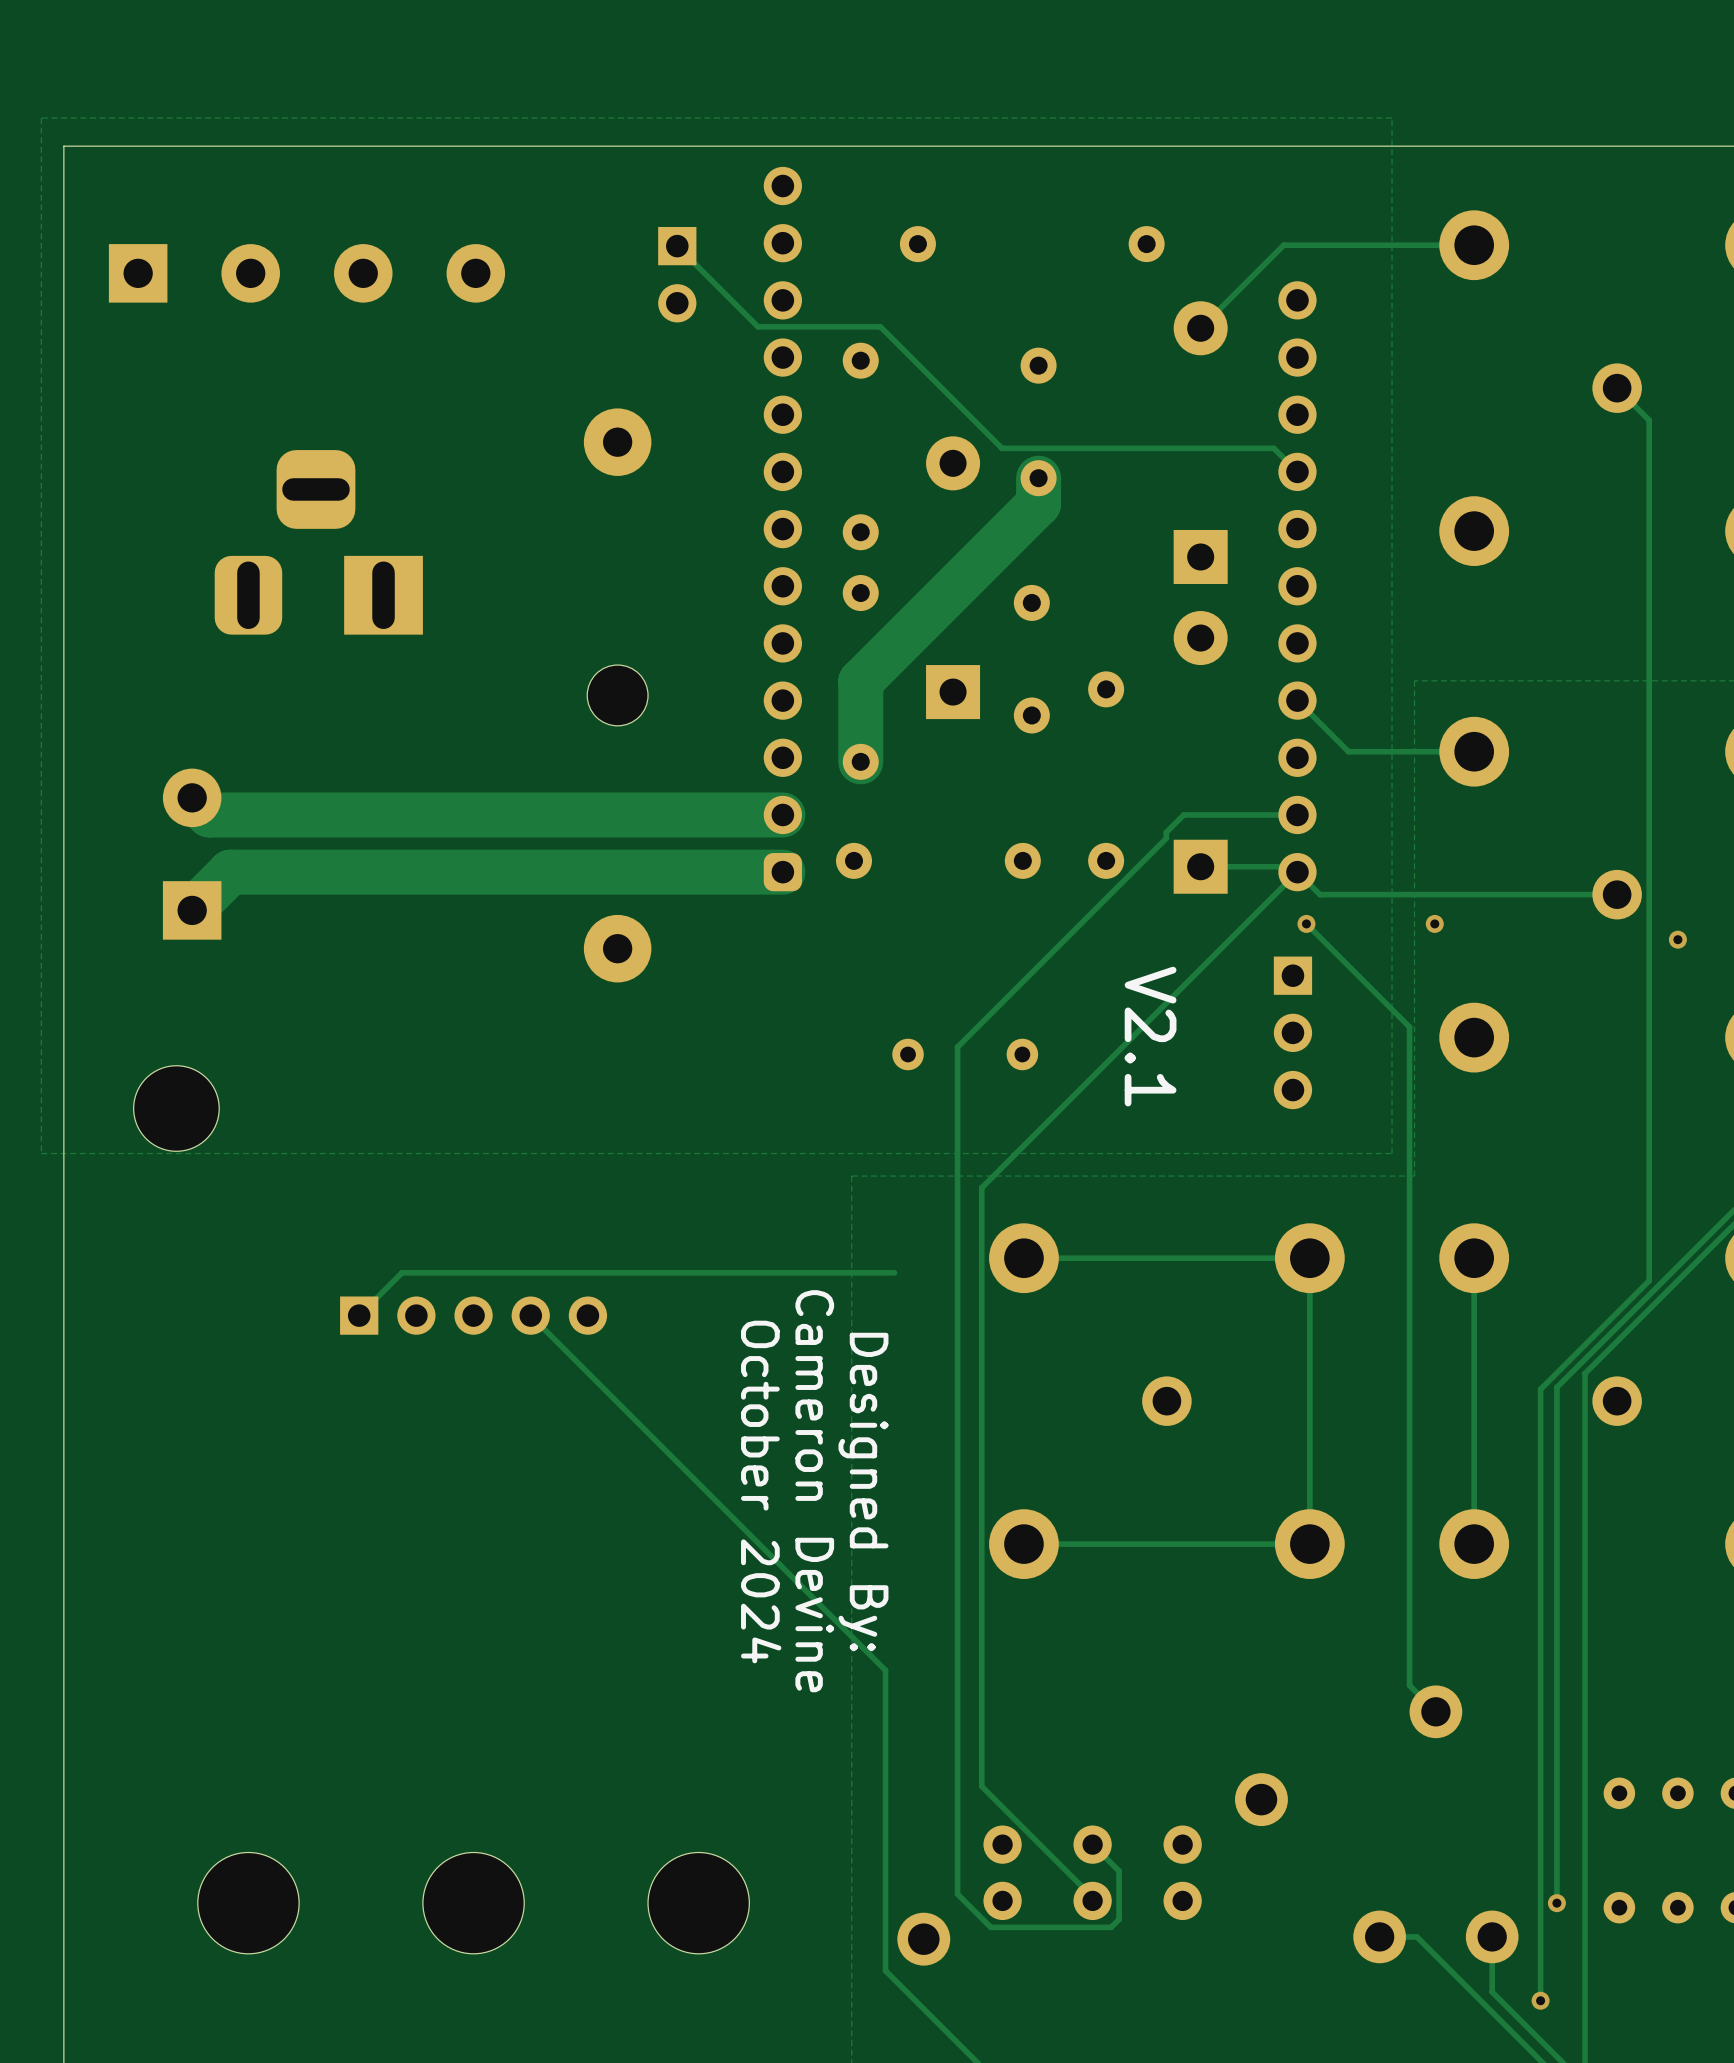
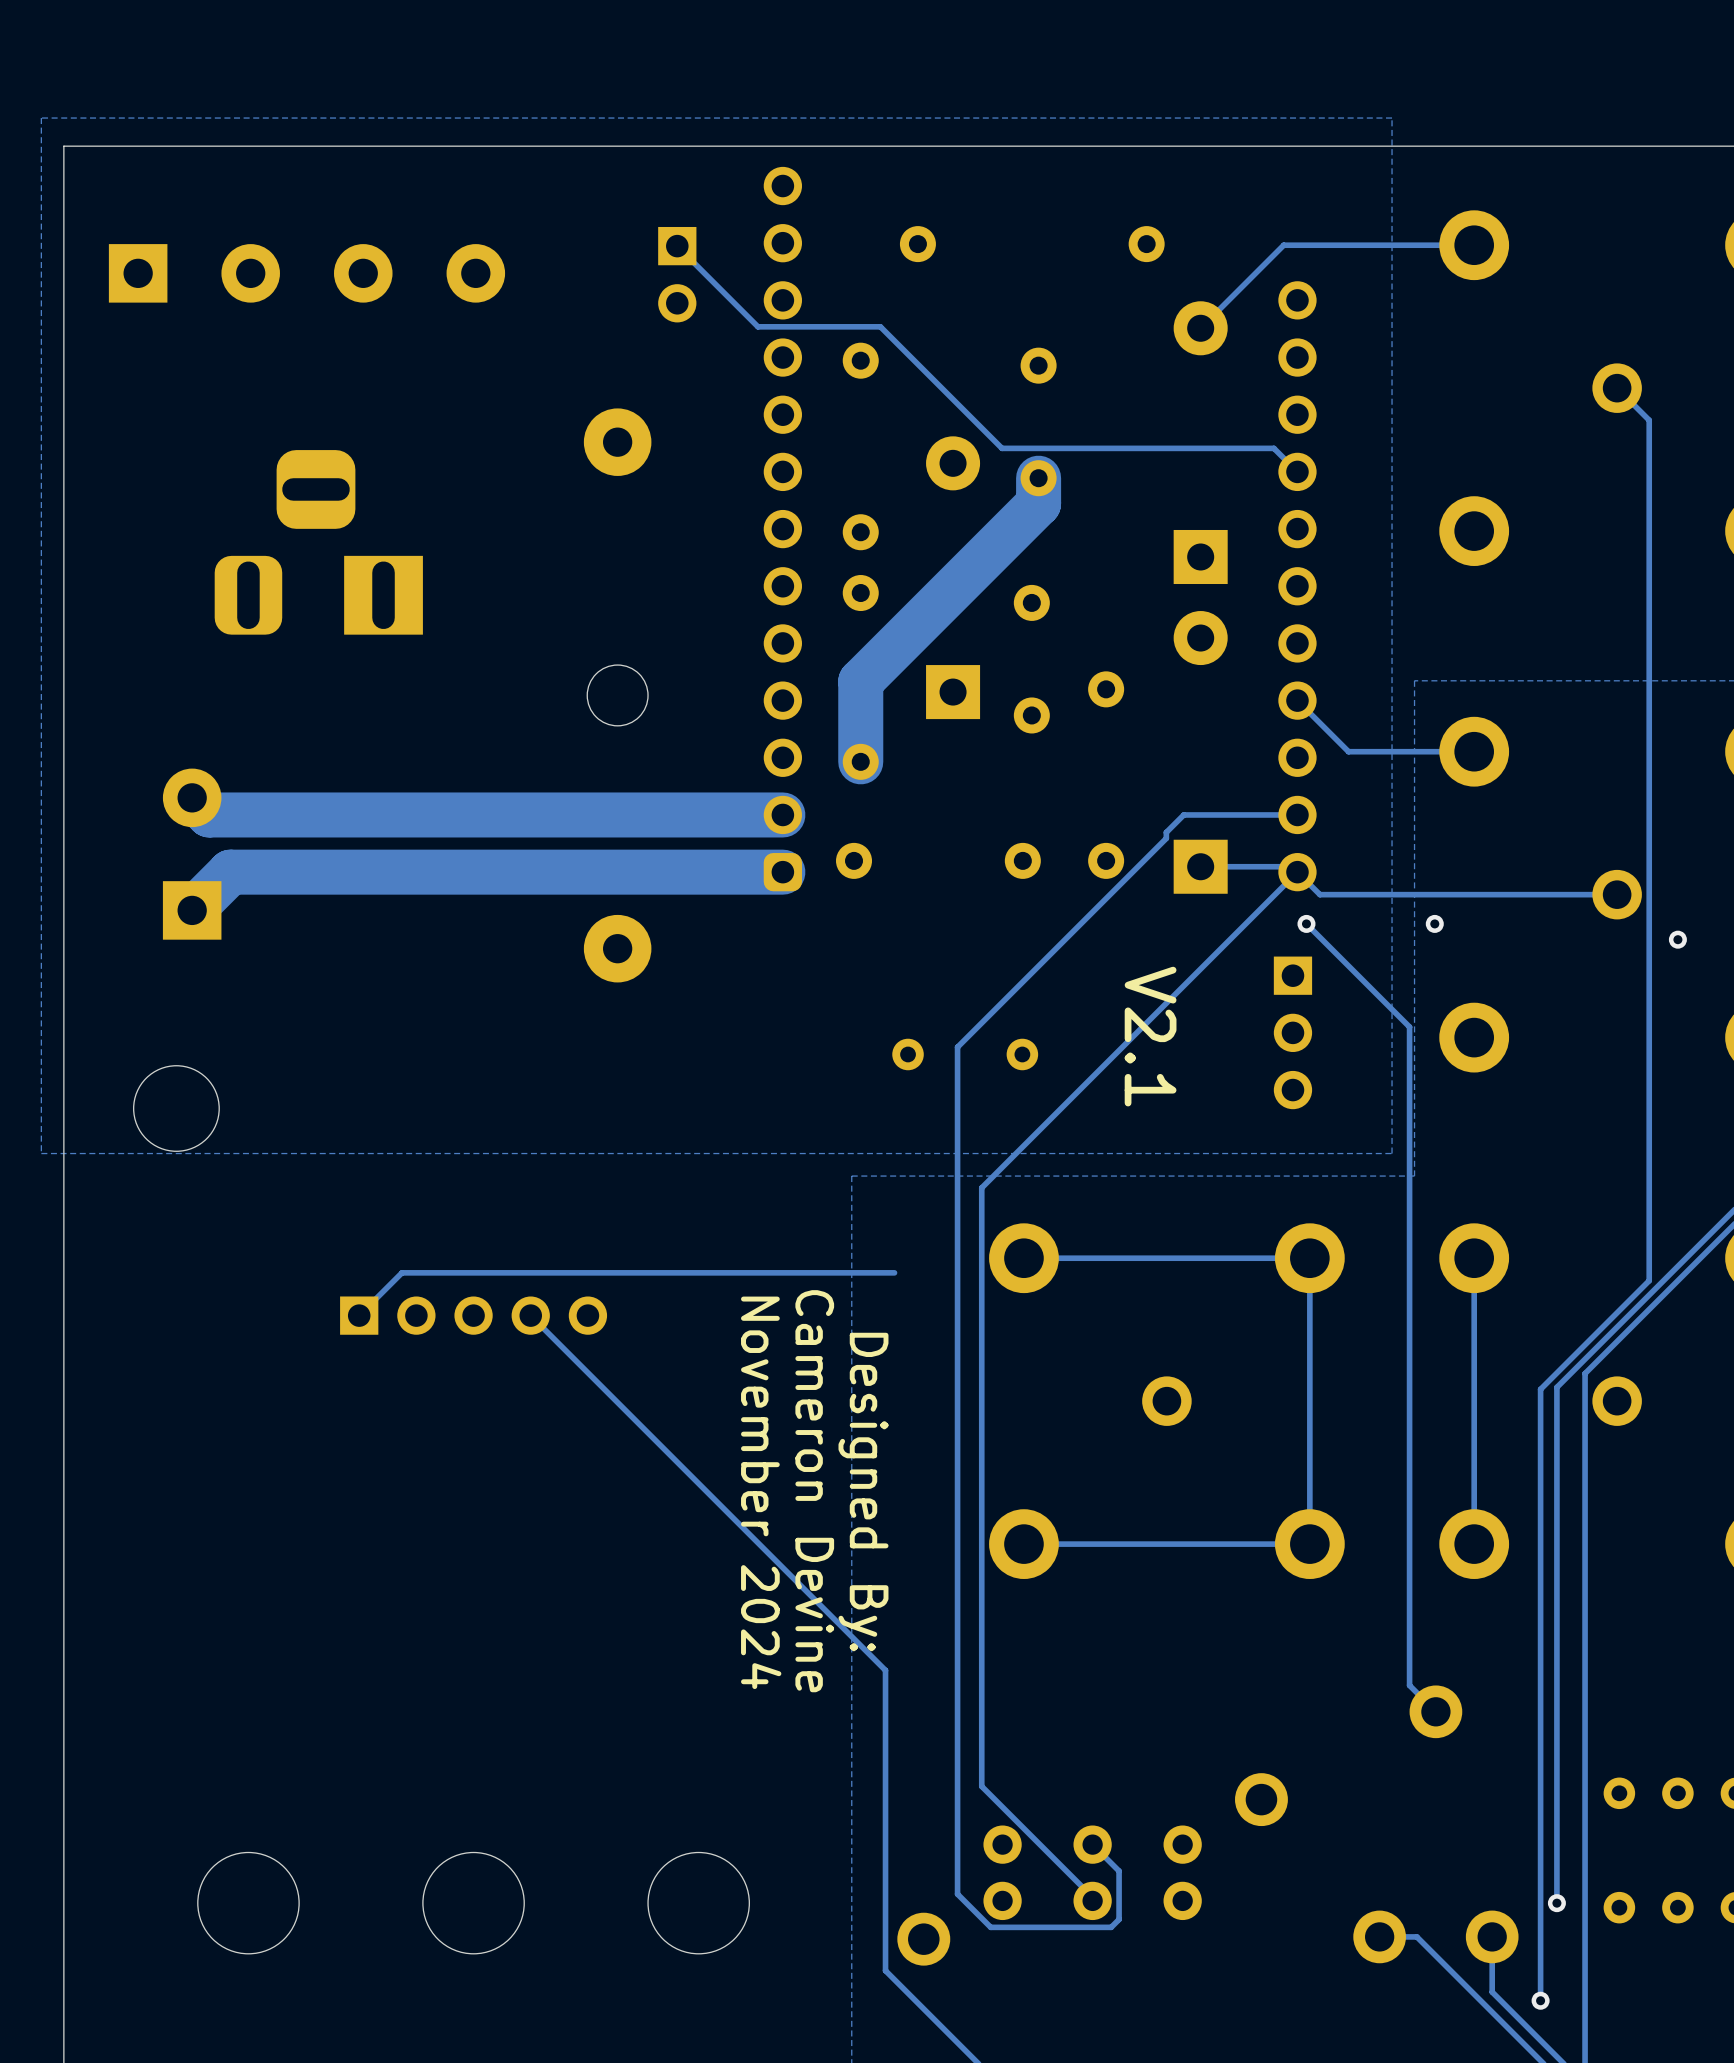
text: October 2024 (761, 1492) -> November 2024 (761, 1492)

